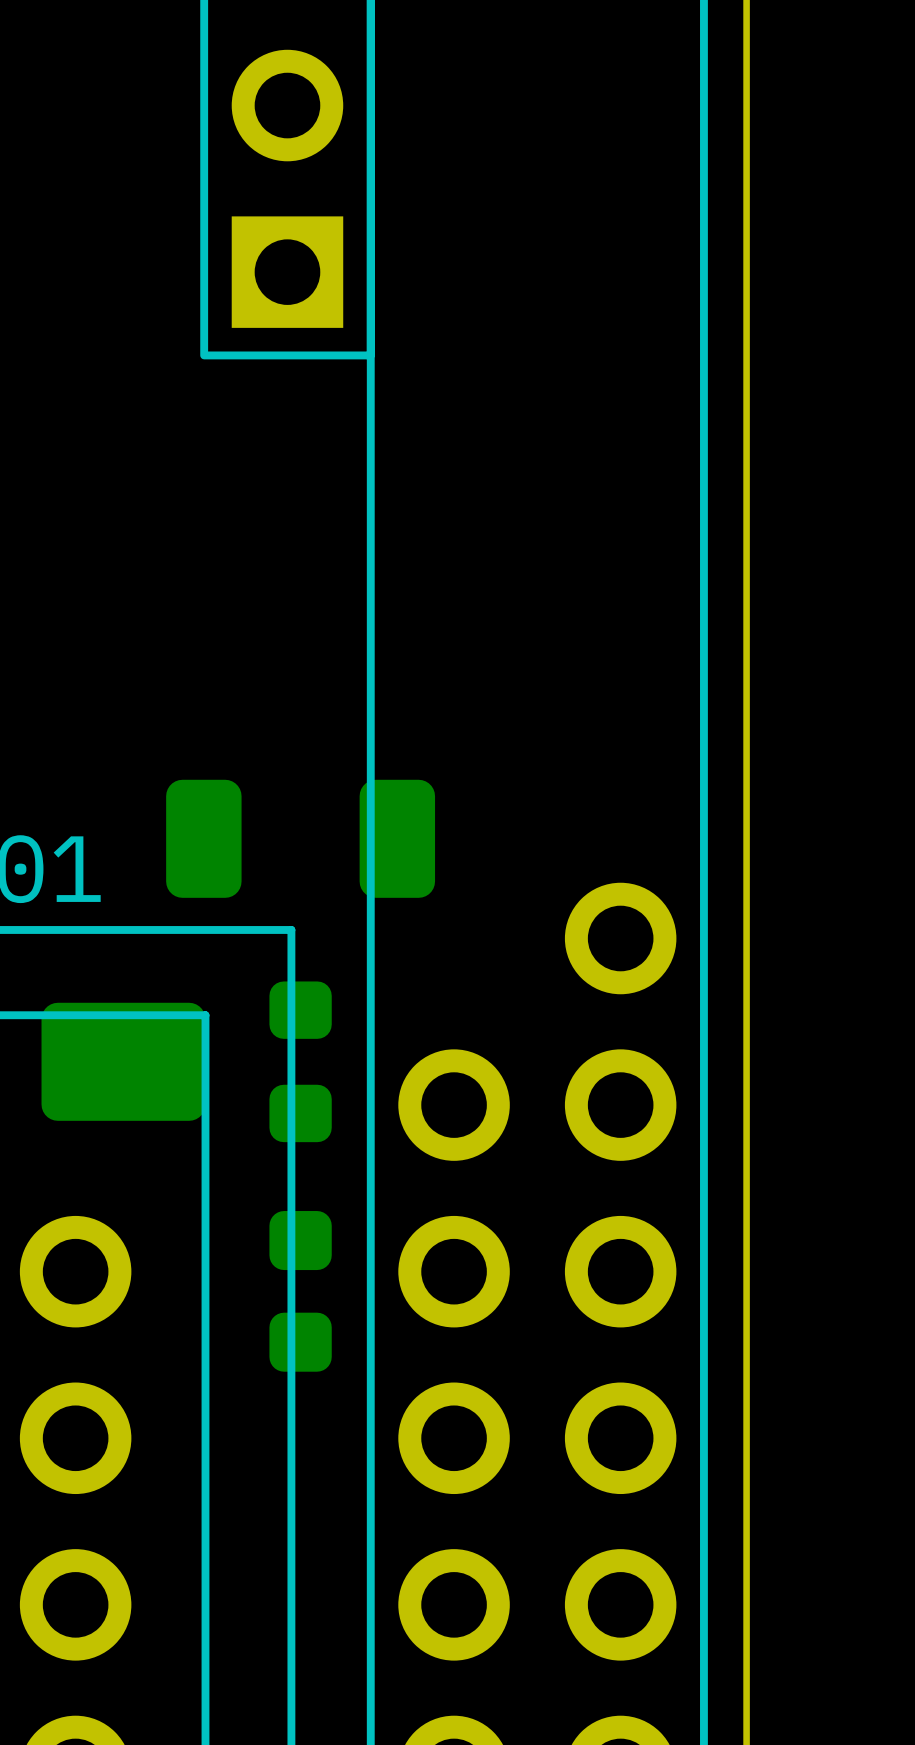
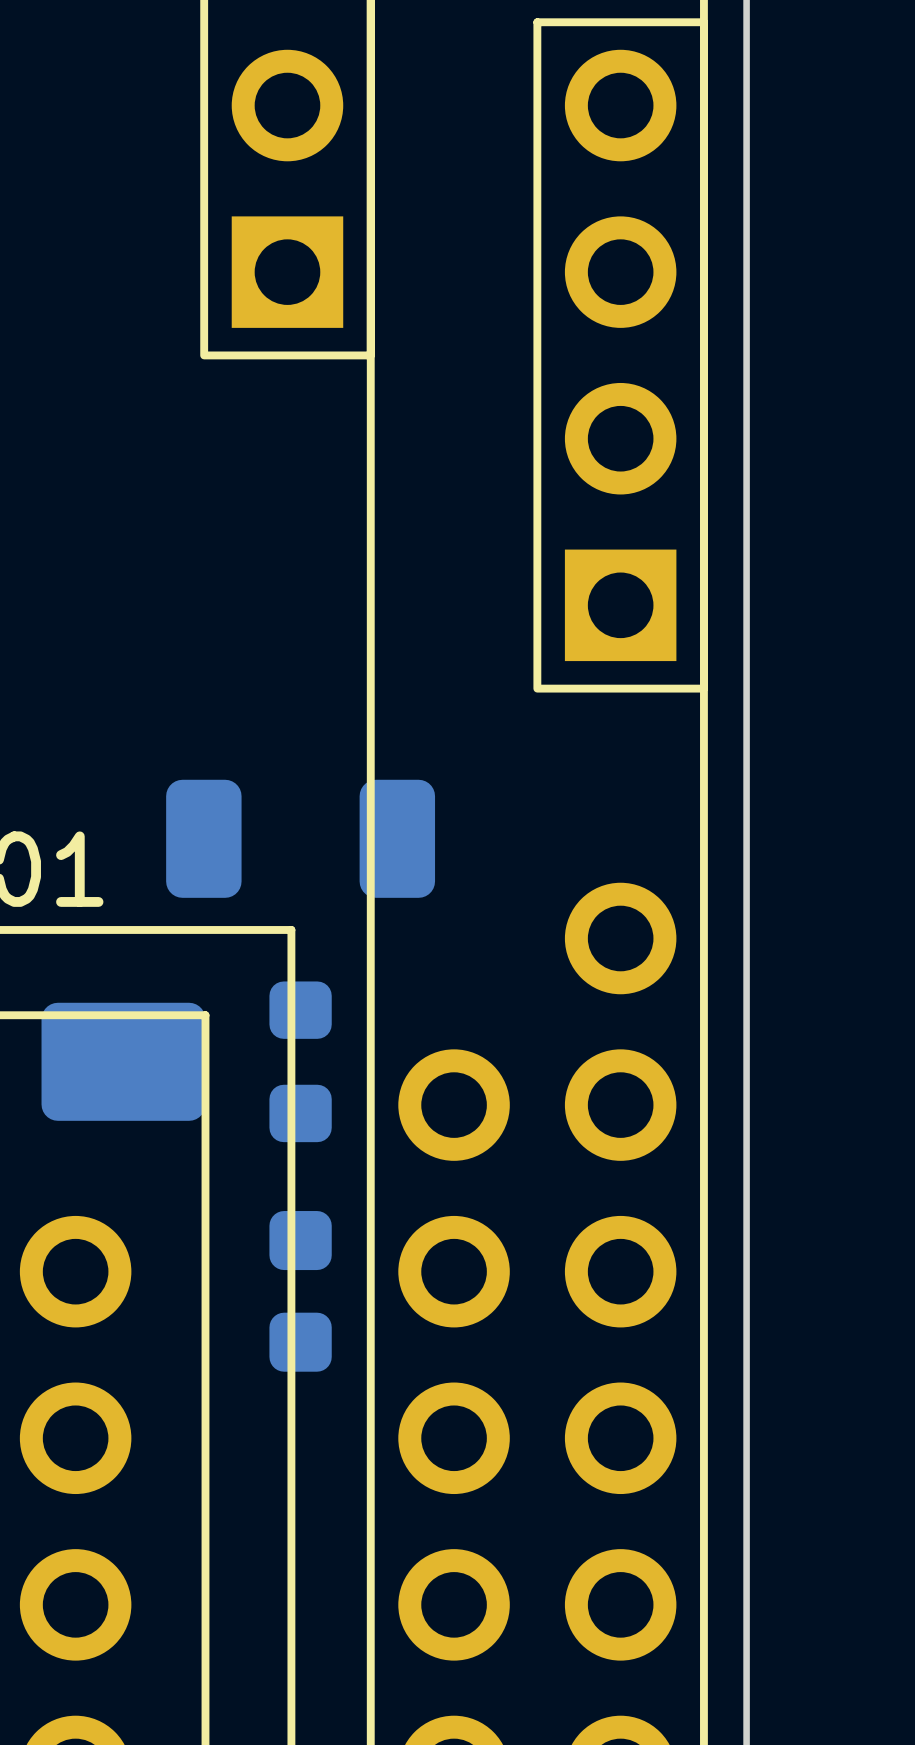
part: none -> (620, 355)

